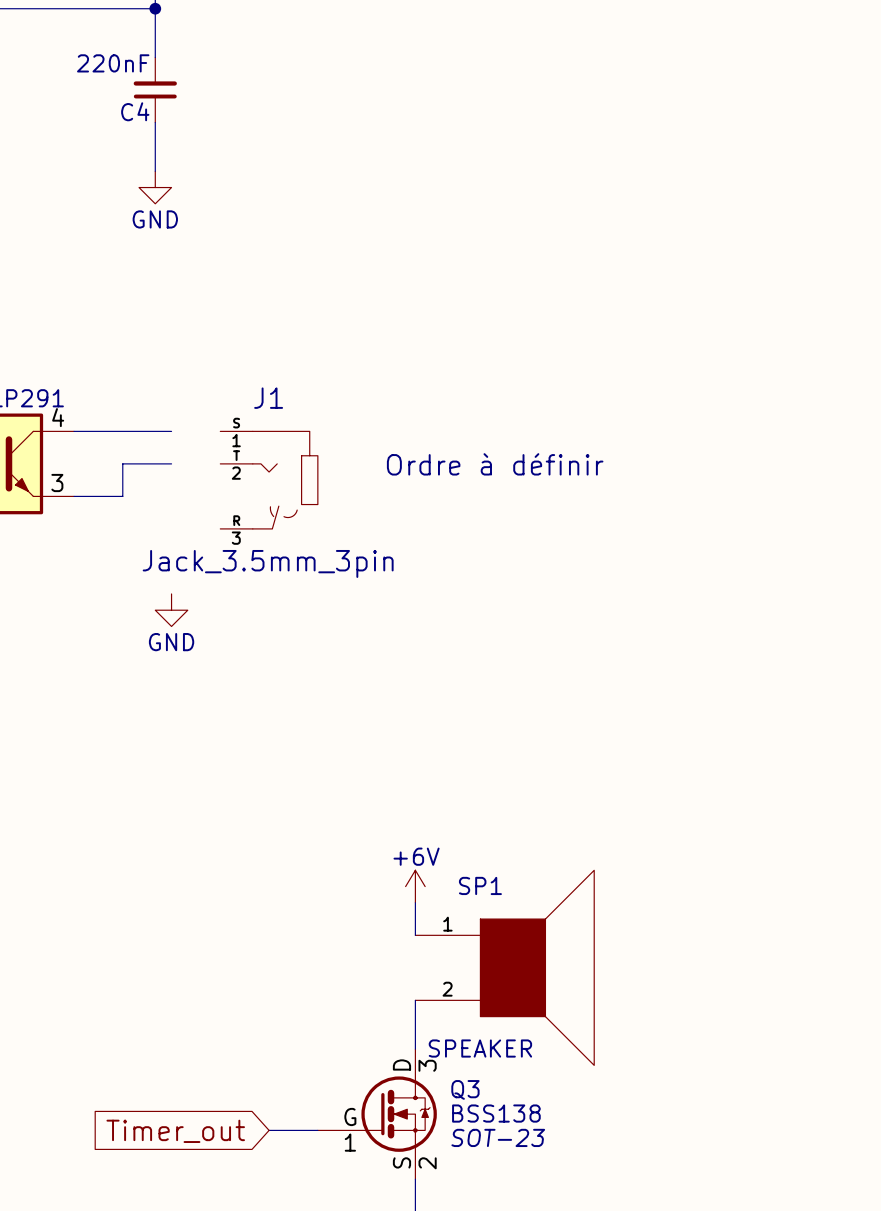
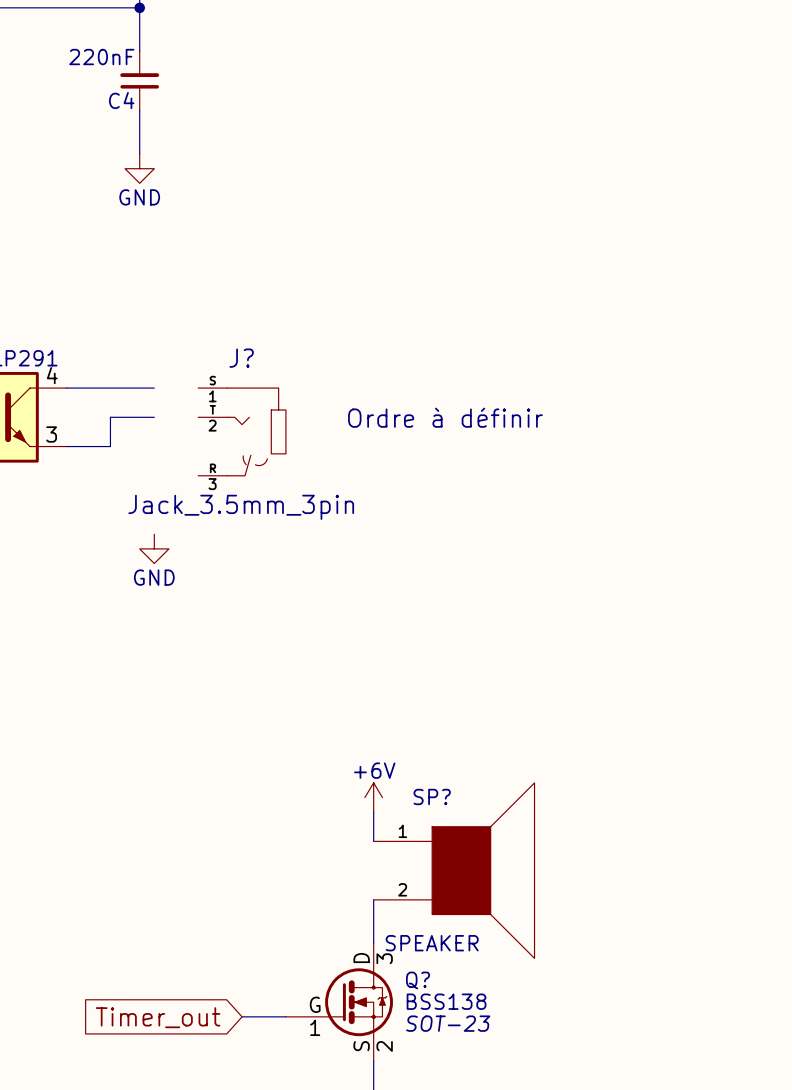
J1 name: J1 (268, 398) -> J? (241, 358)
SP1 name: SP1 (480, 885) -> SP? (432, 796)
Q3 name: Q3 (465, 1089) -> Q? (418, 980)

